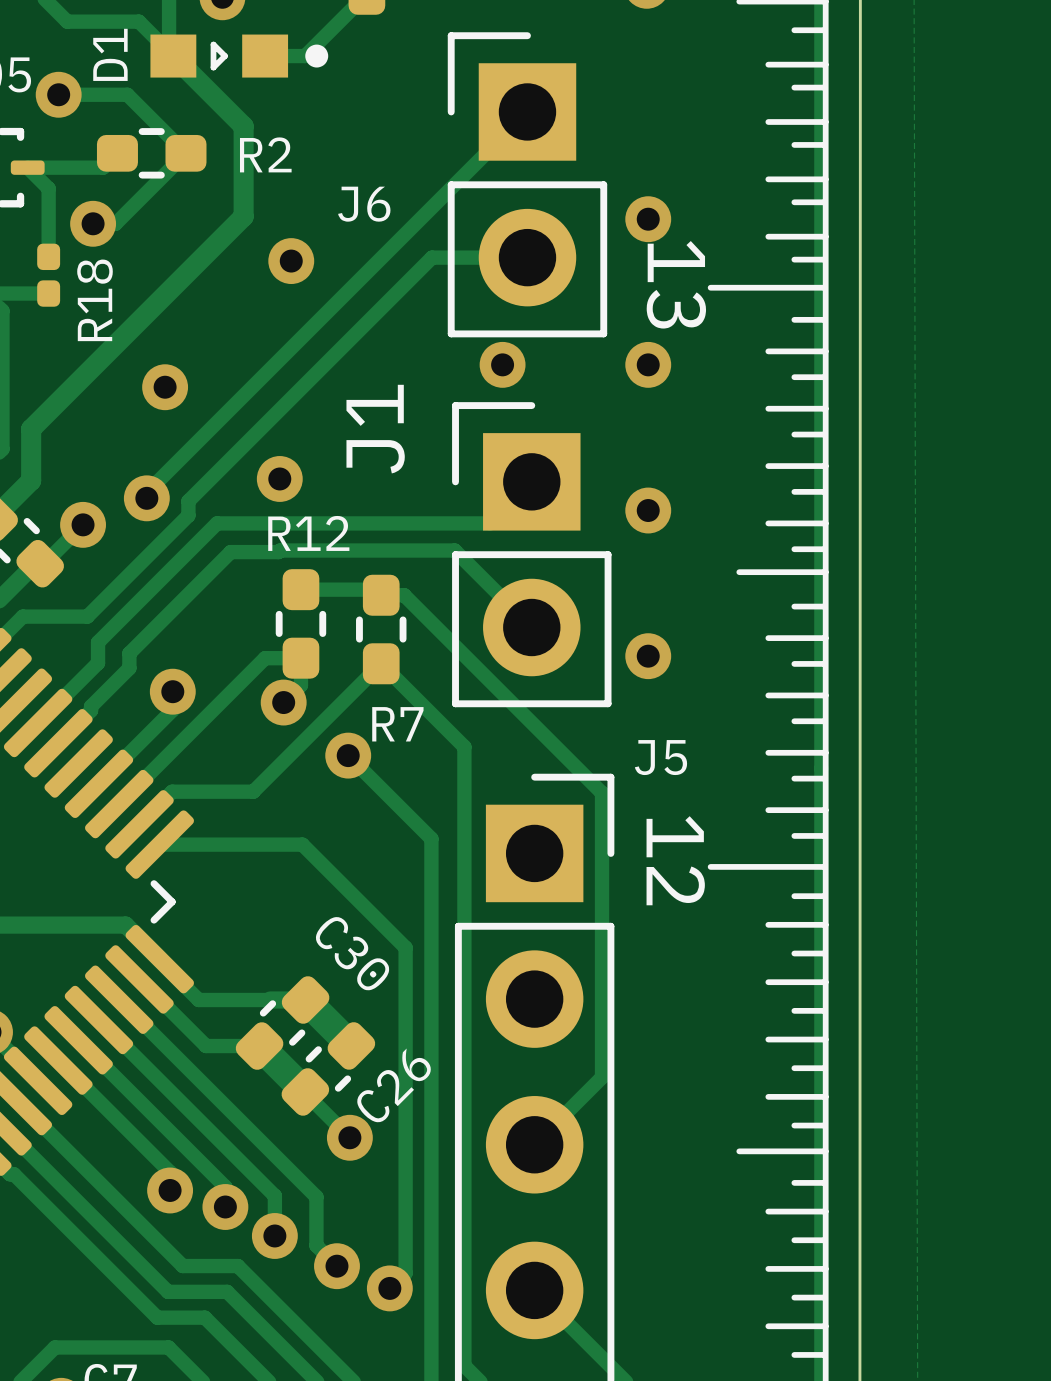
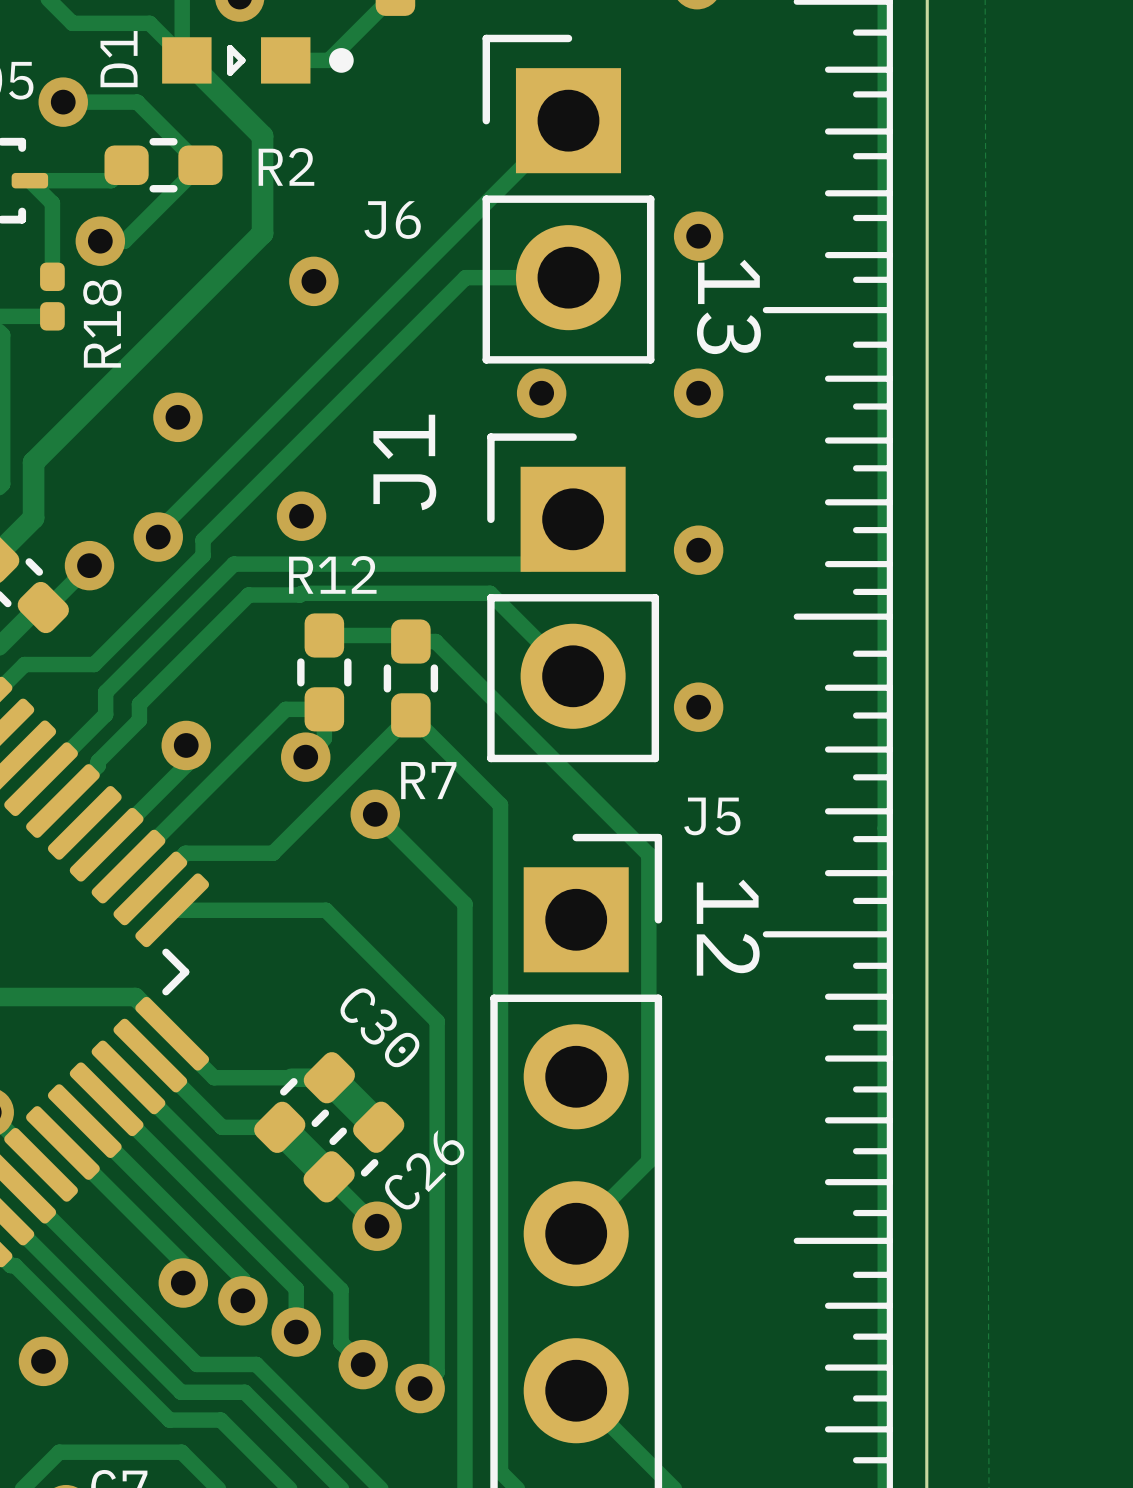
via: none -> (43, 1361)

